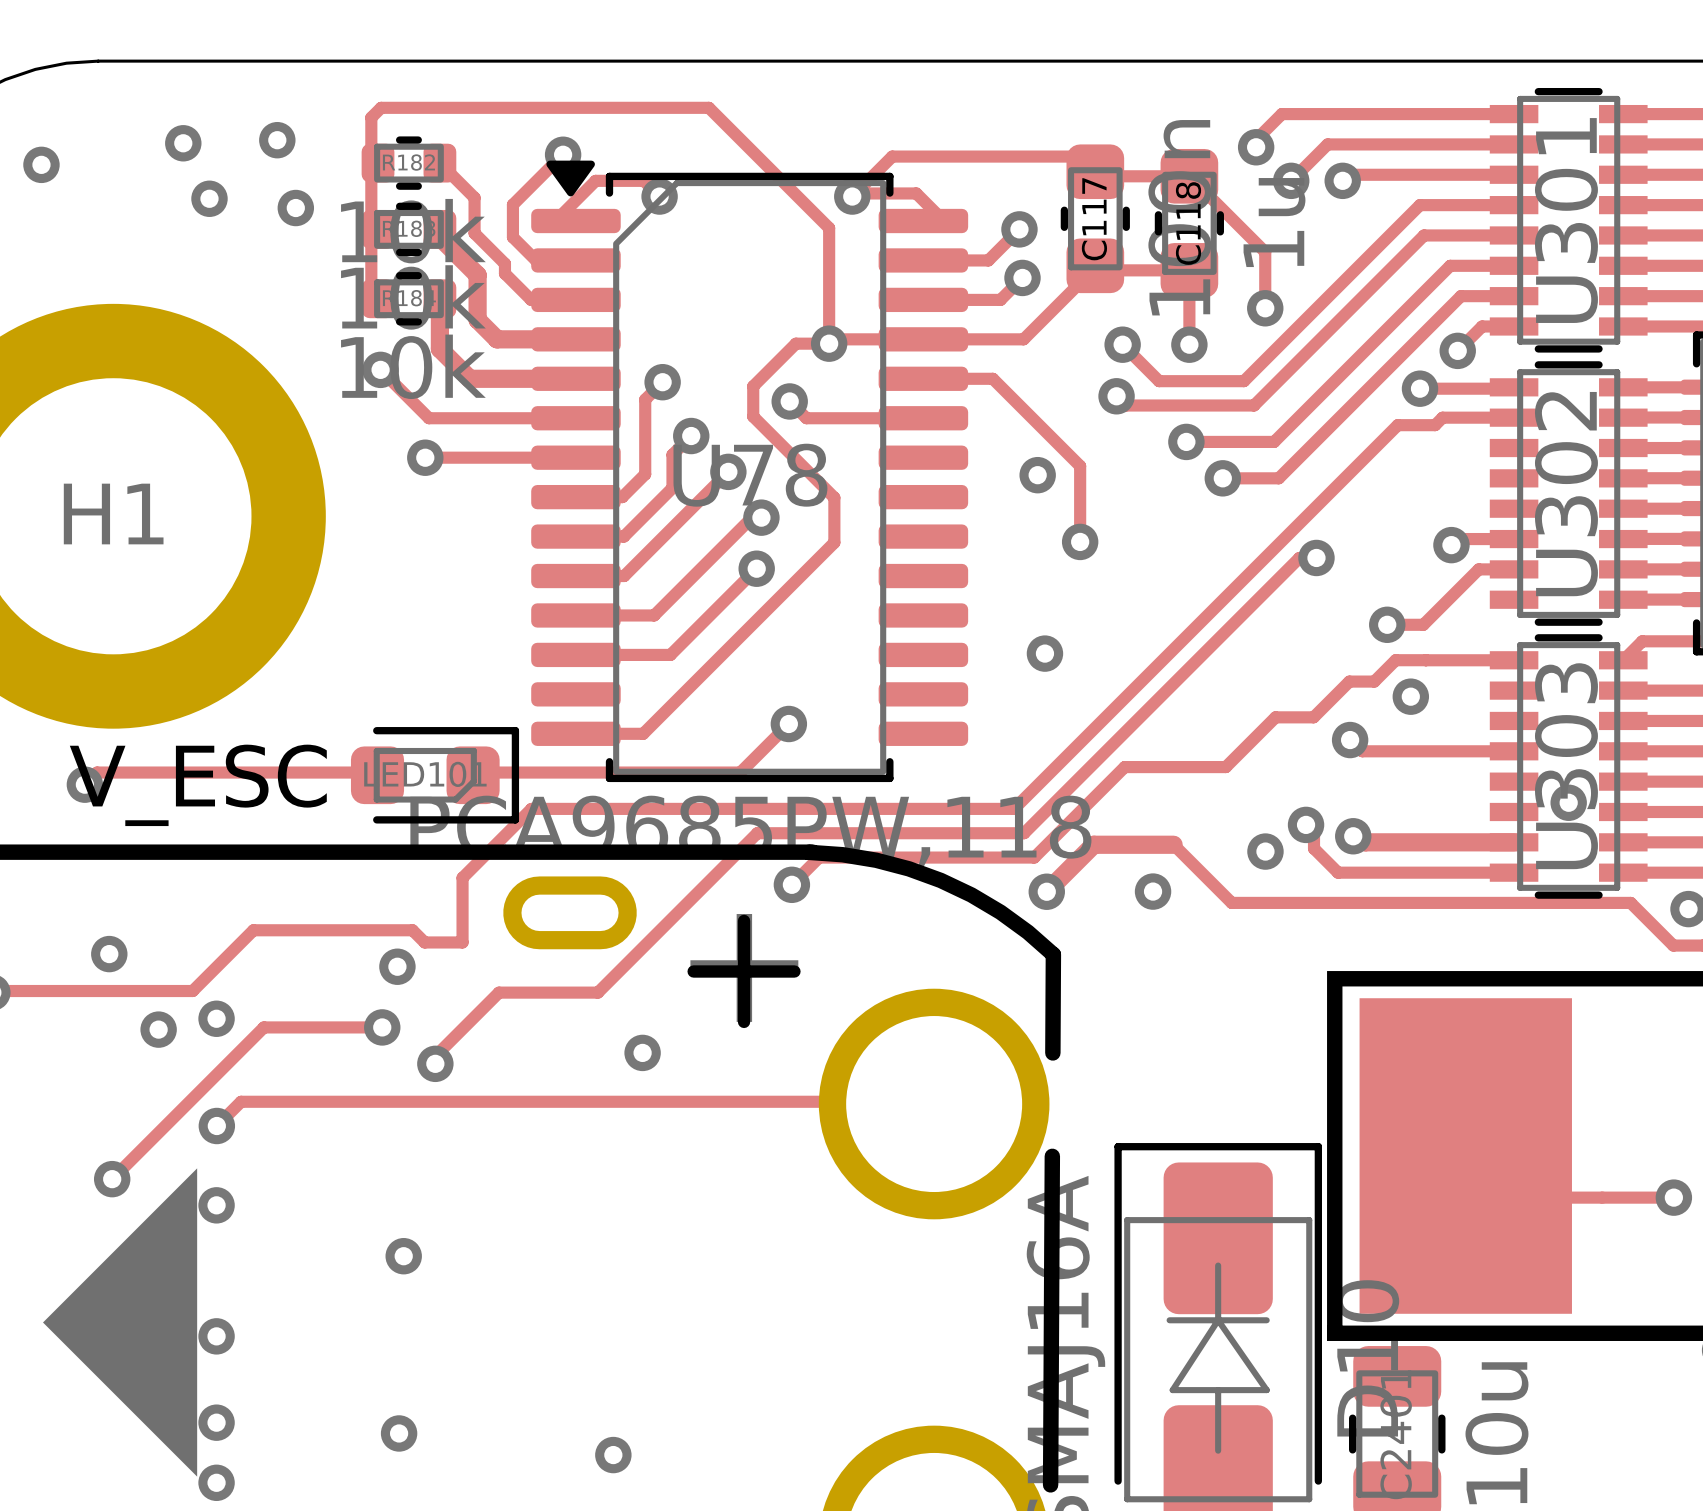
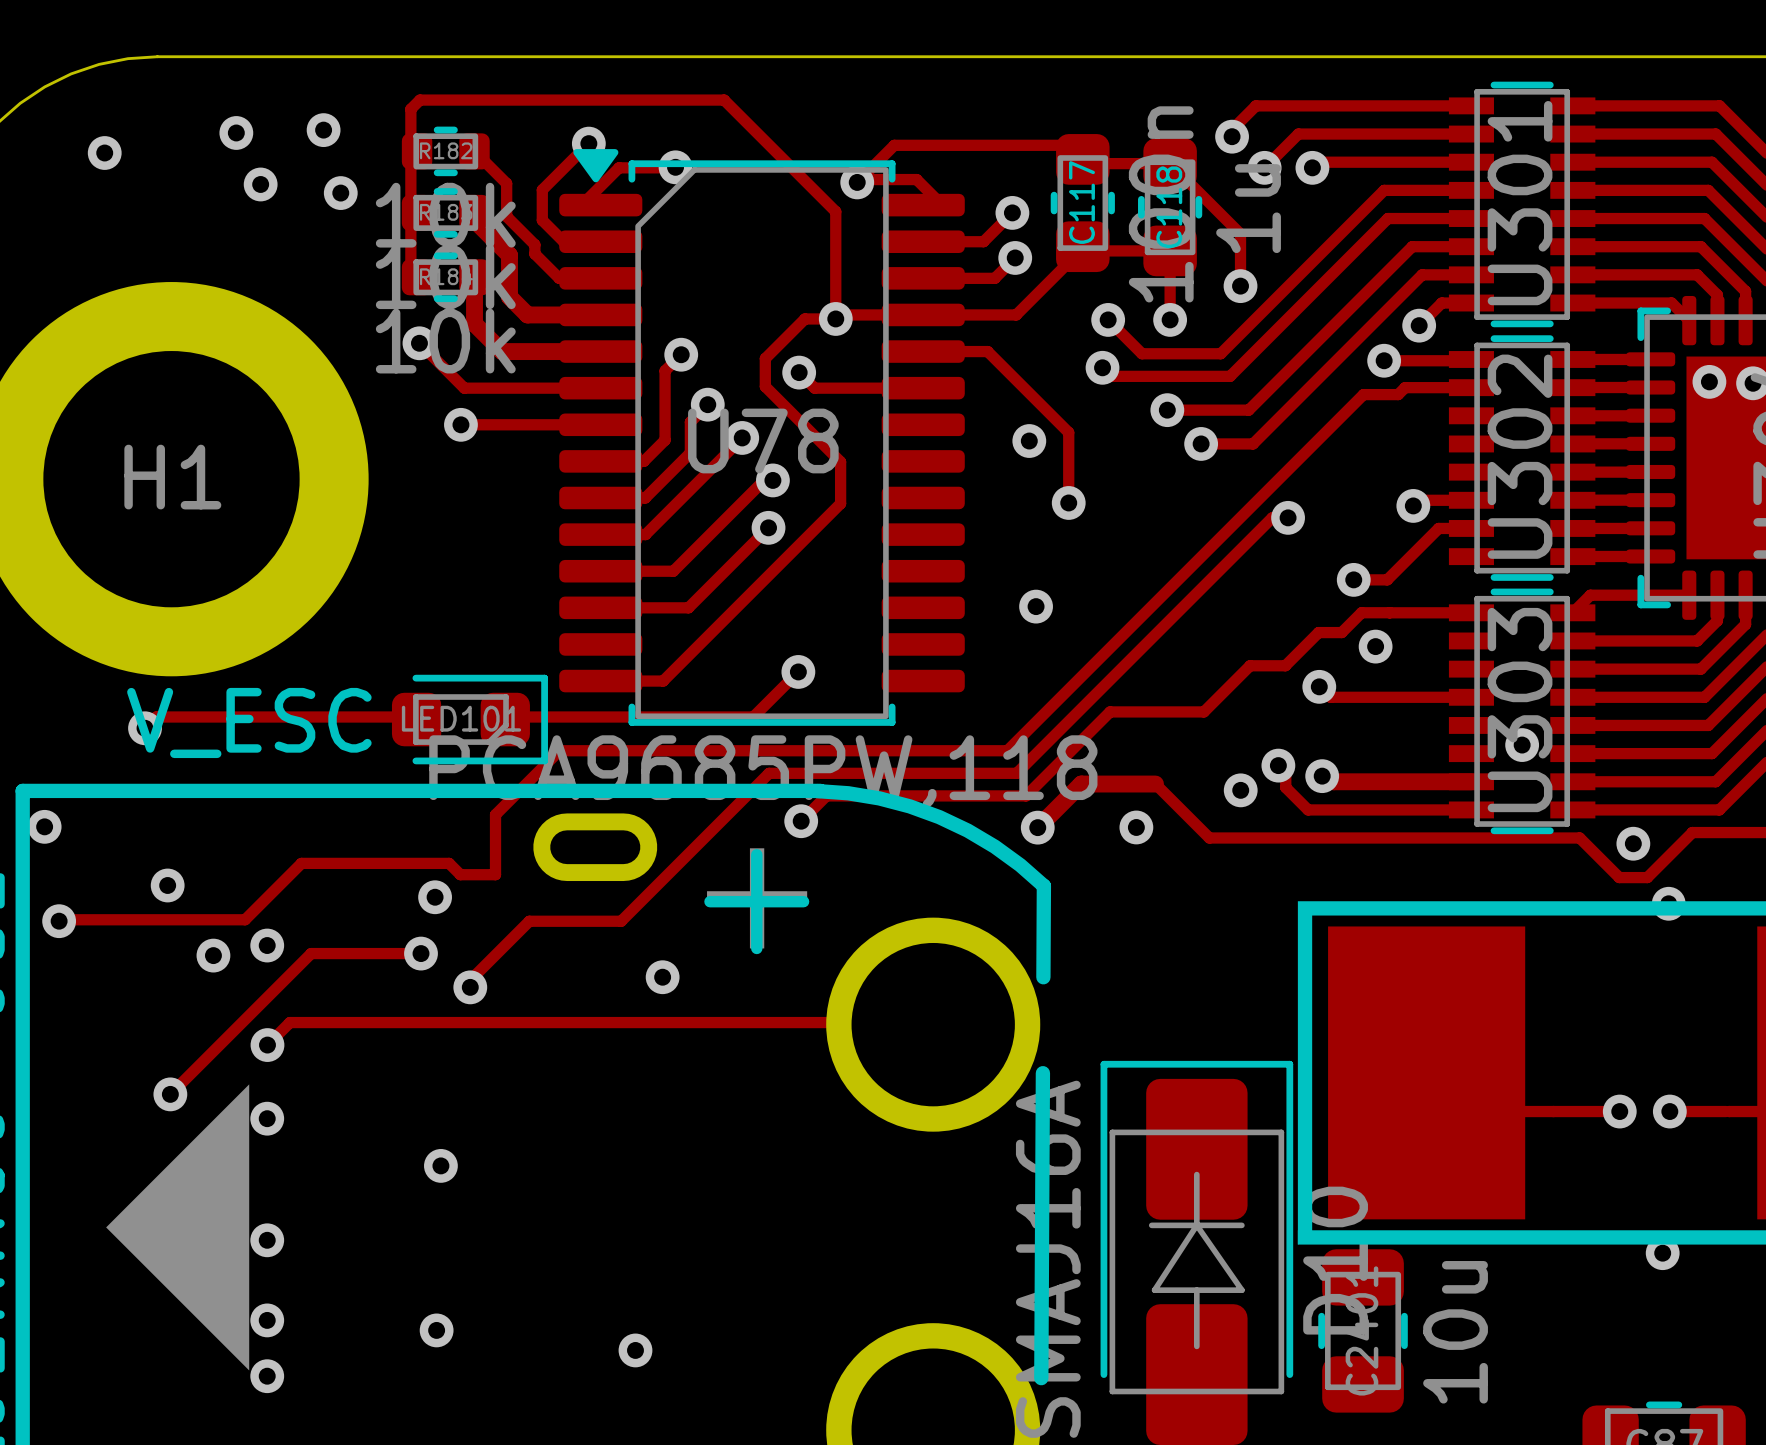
via position: (659, 196) -> (675, 167)

